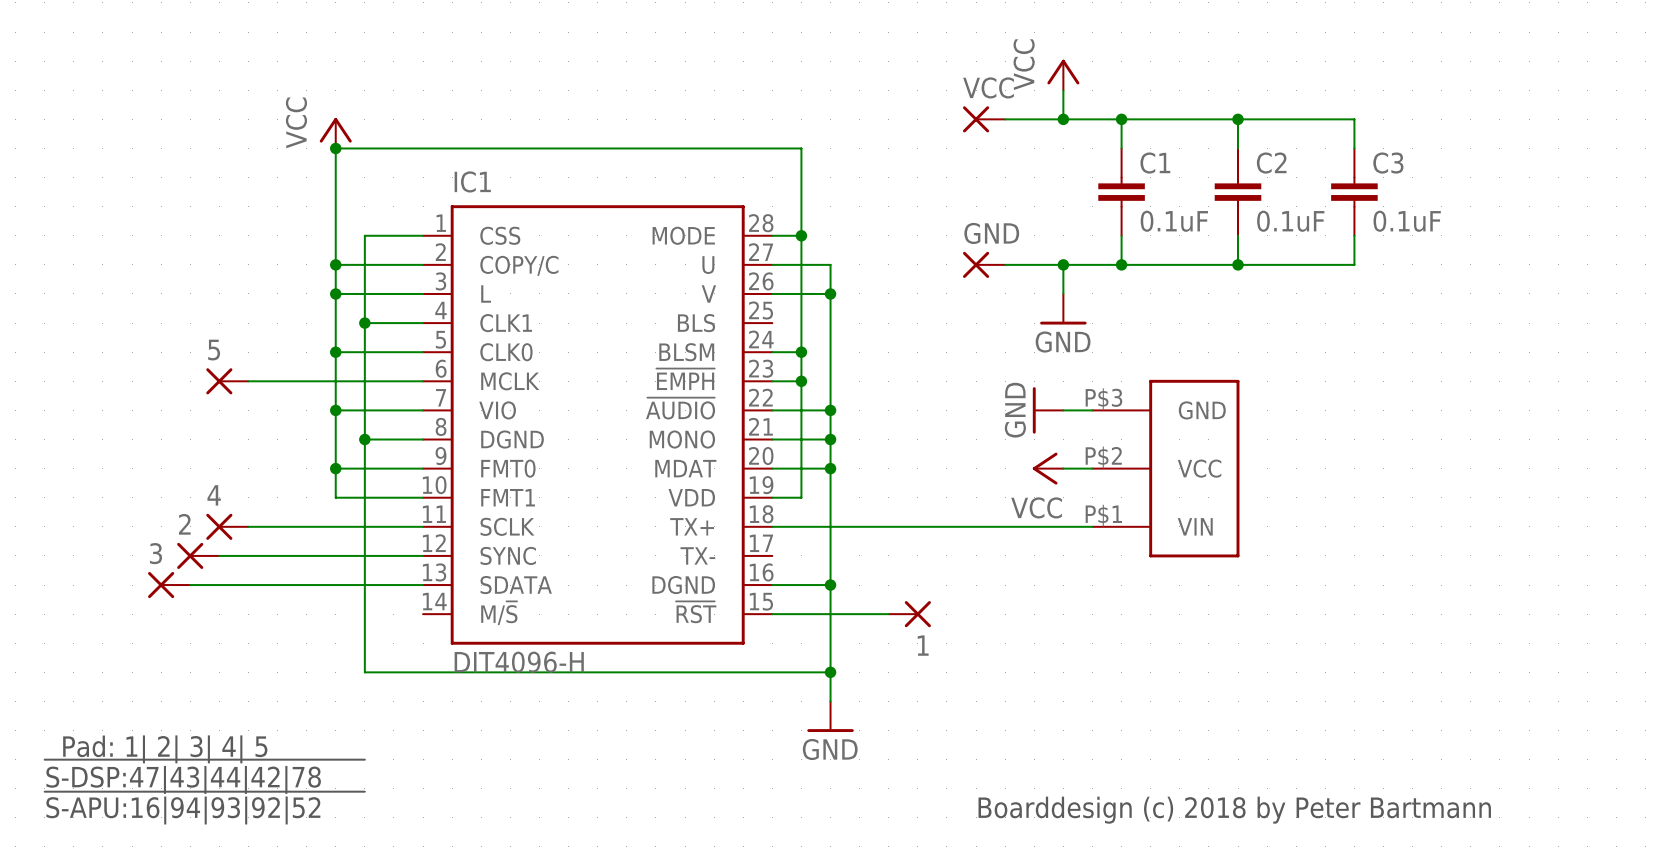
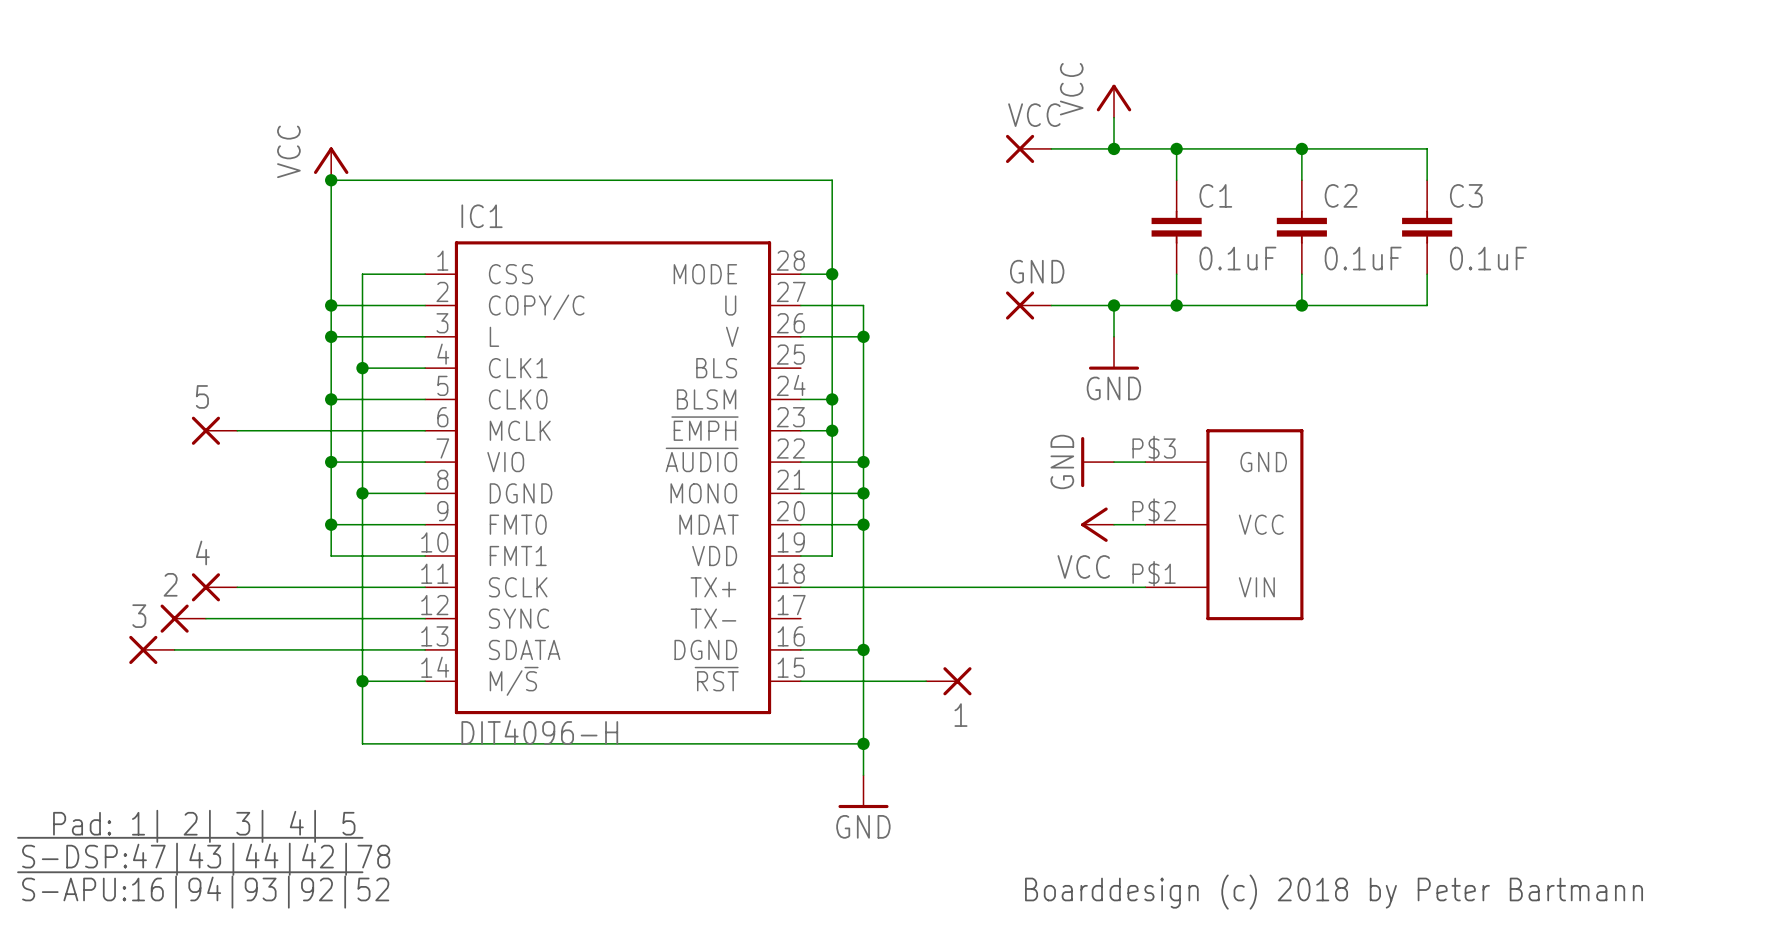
wire: none -> (362, 681) (425, 681)
junction: none -> (362, 681)

